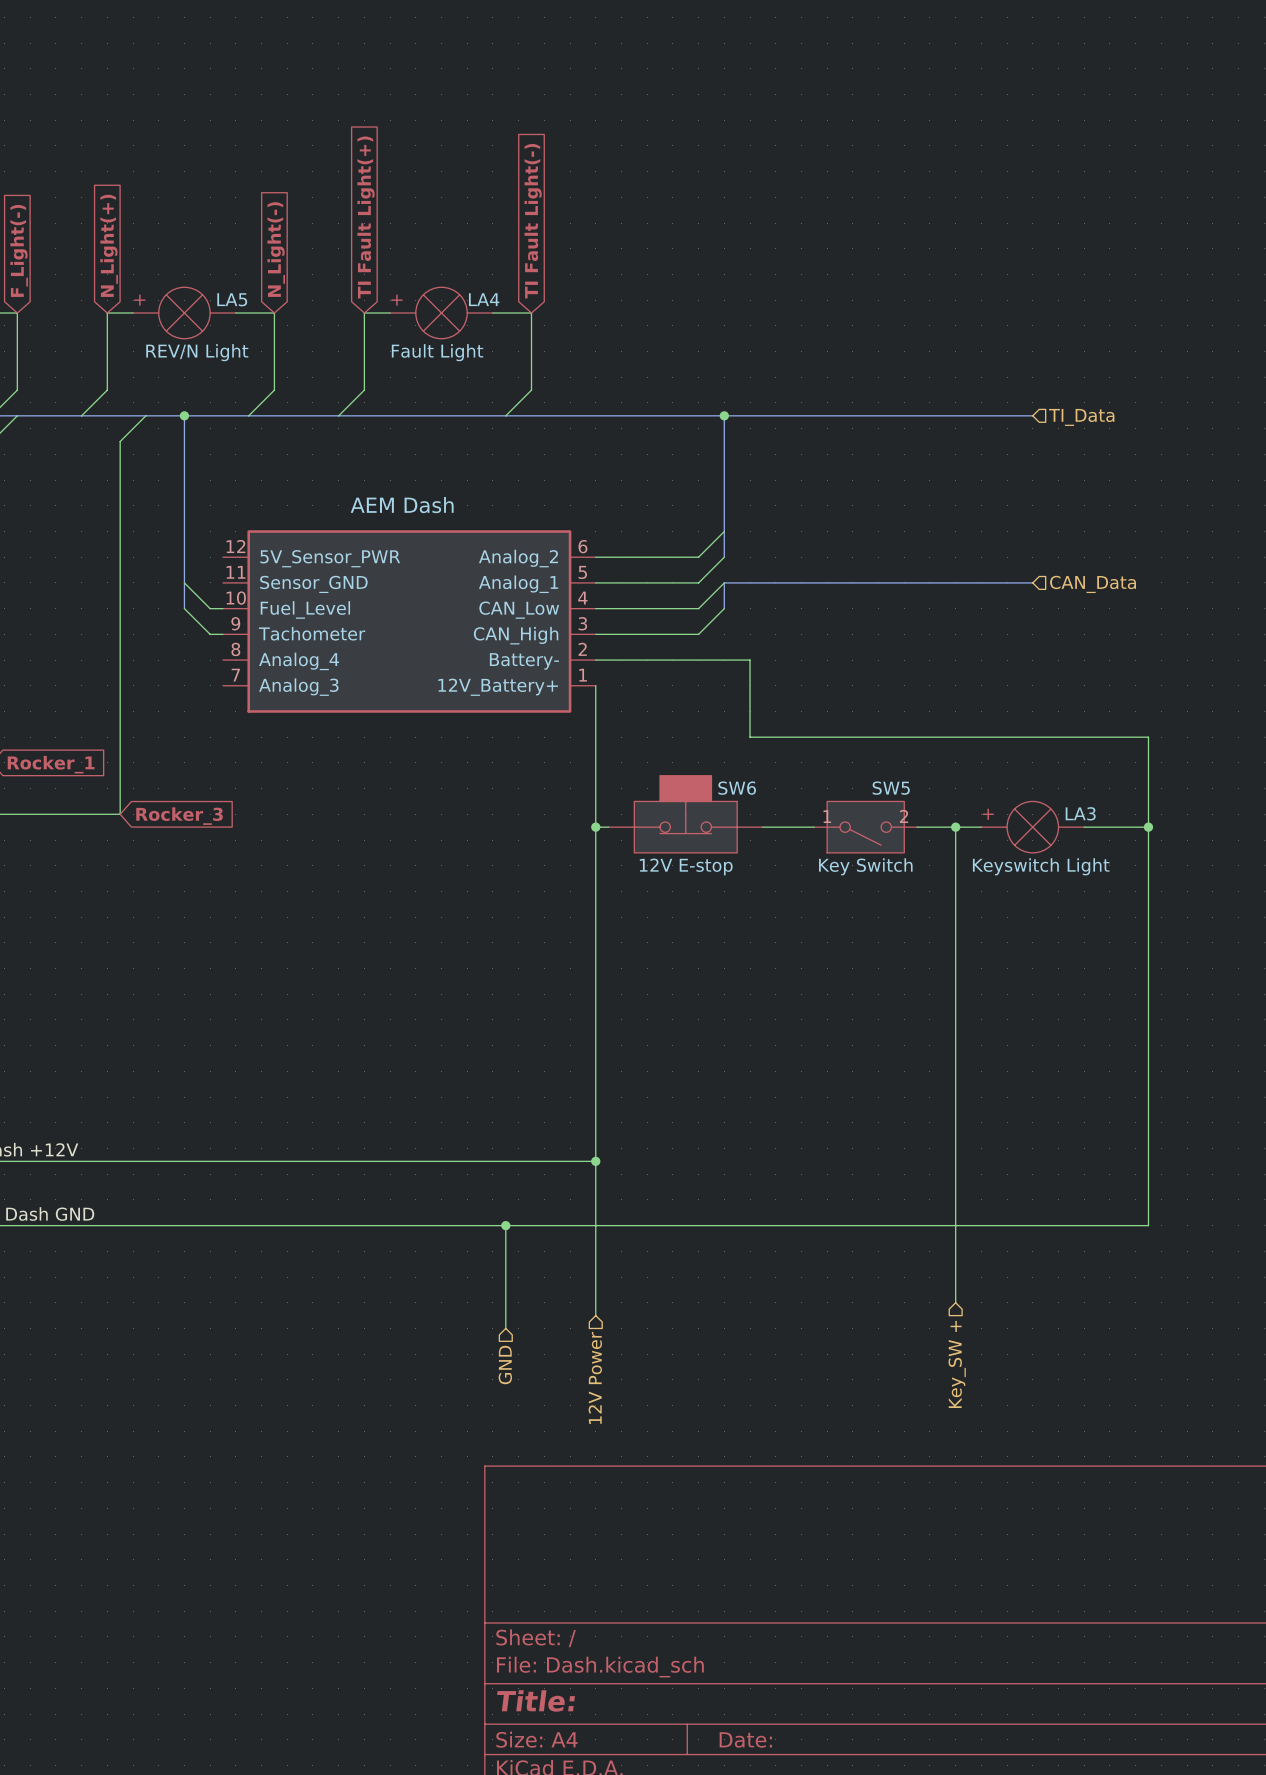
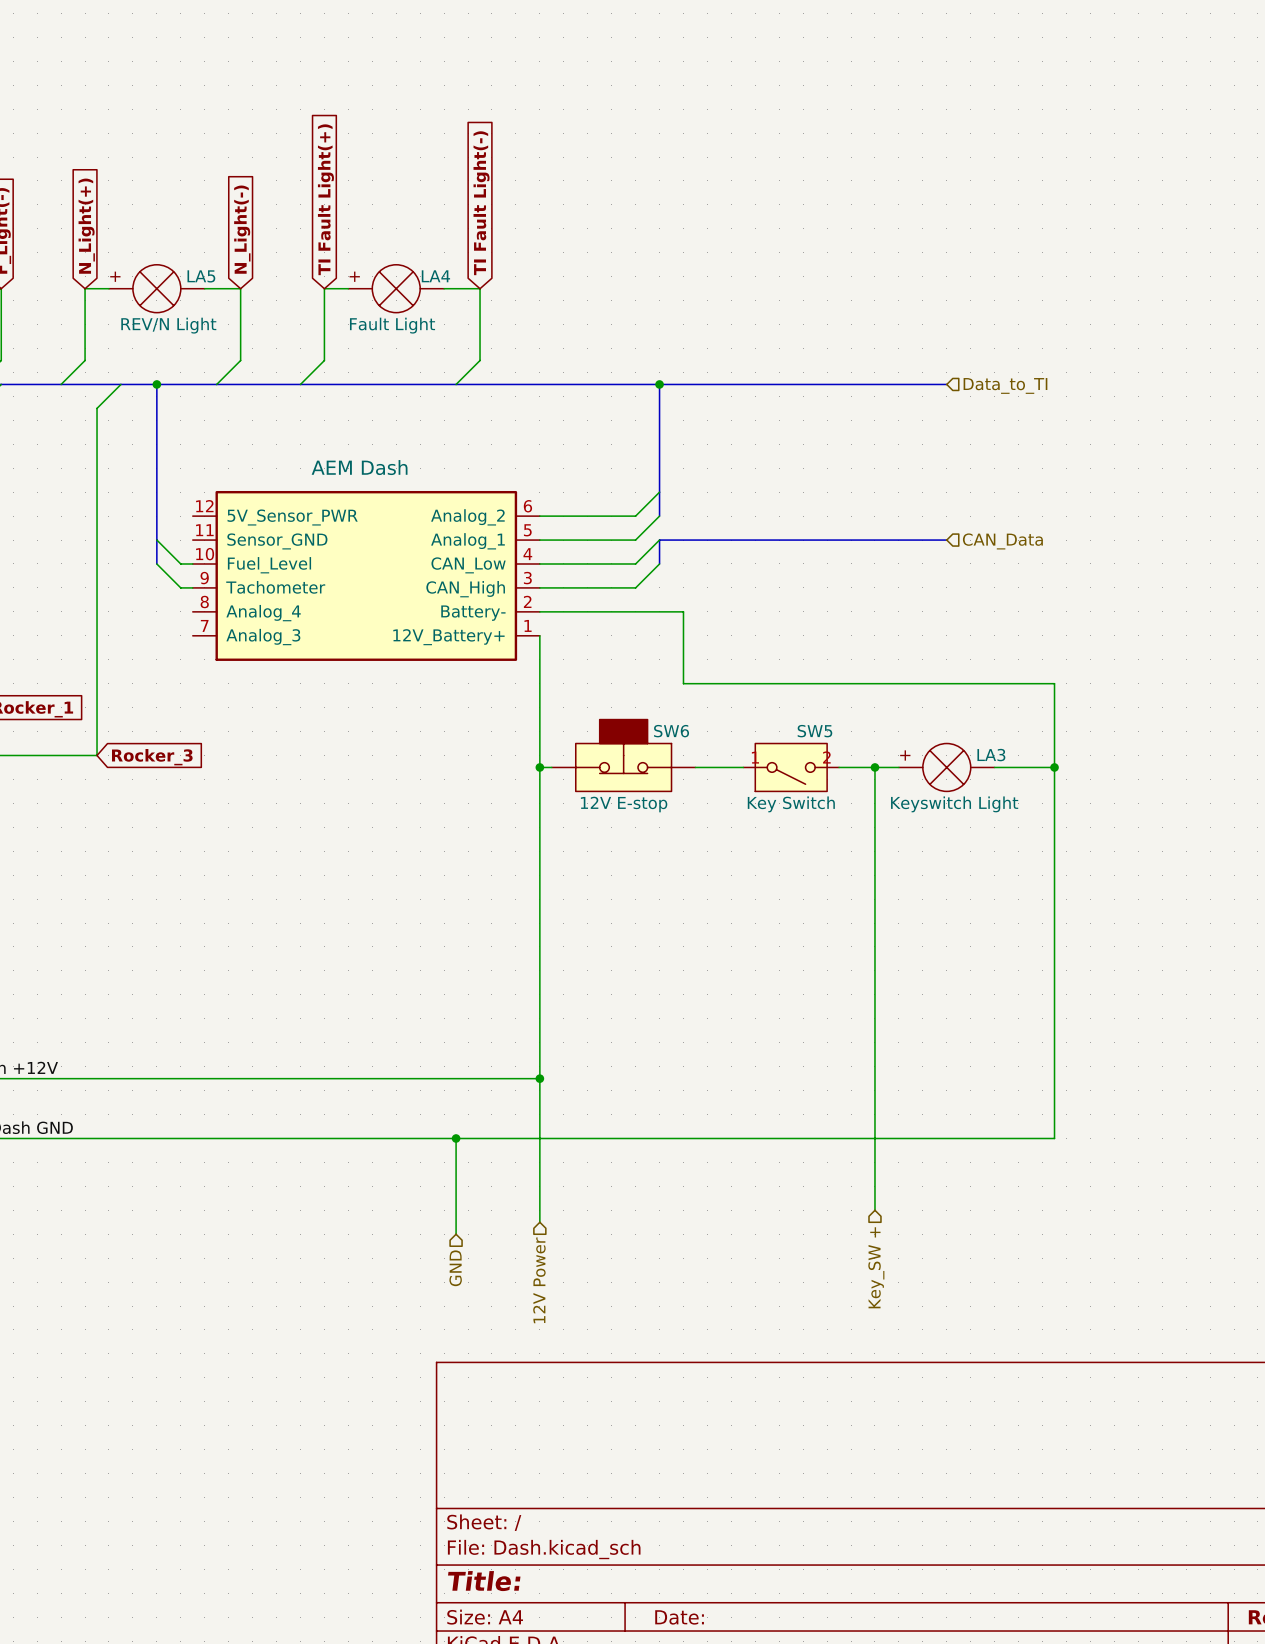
hierarchical label: TI_Data (1081, 417) -> Data_to_TI (1005, 385)

